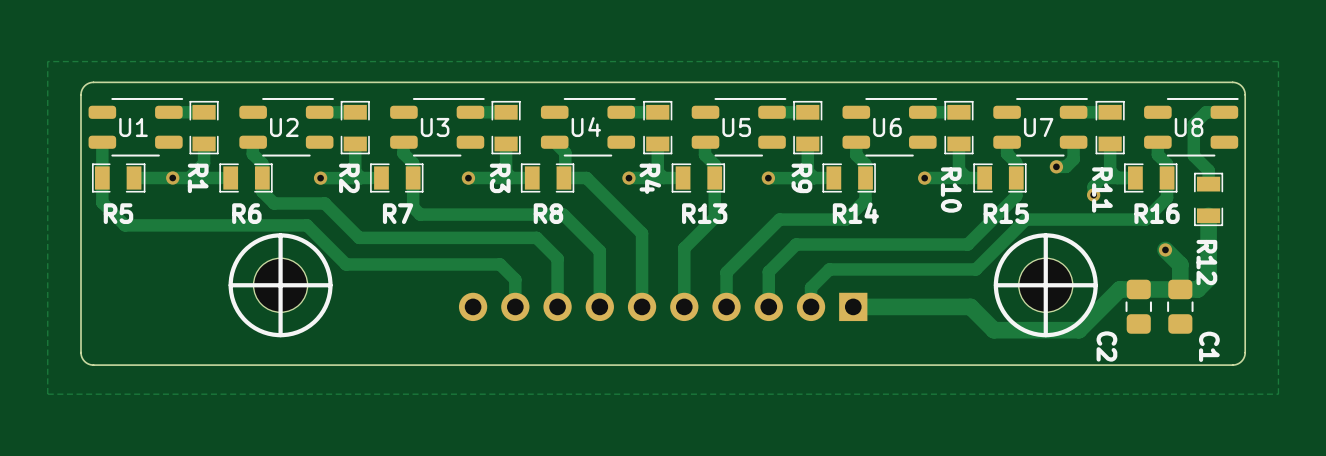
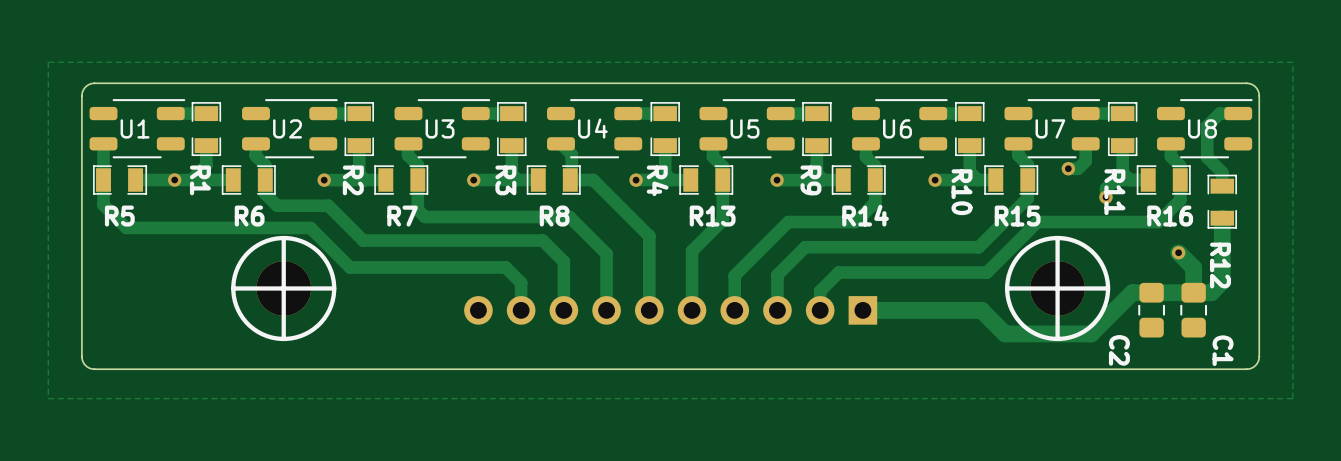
part footprint: [228, 233, 333, 338] -> [231, 235, 337, 342]
part footprint: [993, 233, 1098, 338] -> [1004, 235, 1111, 342]

